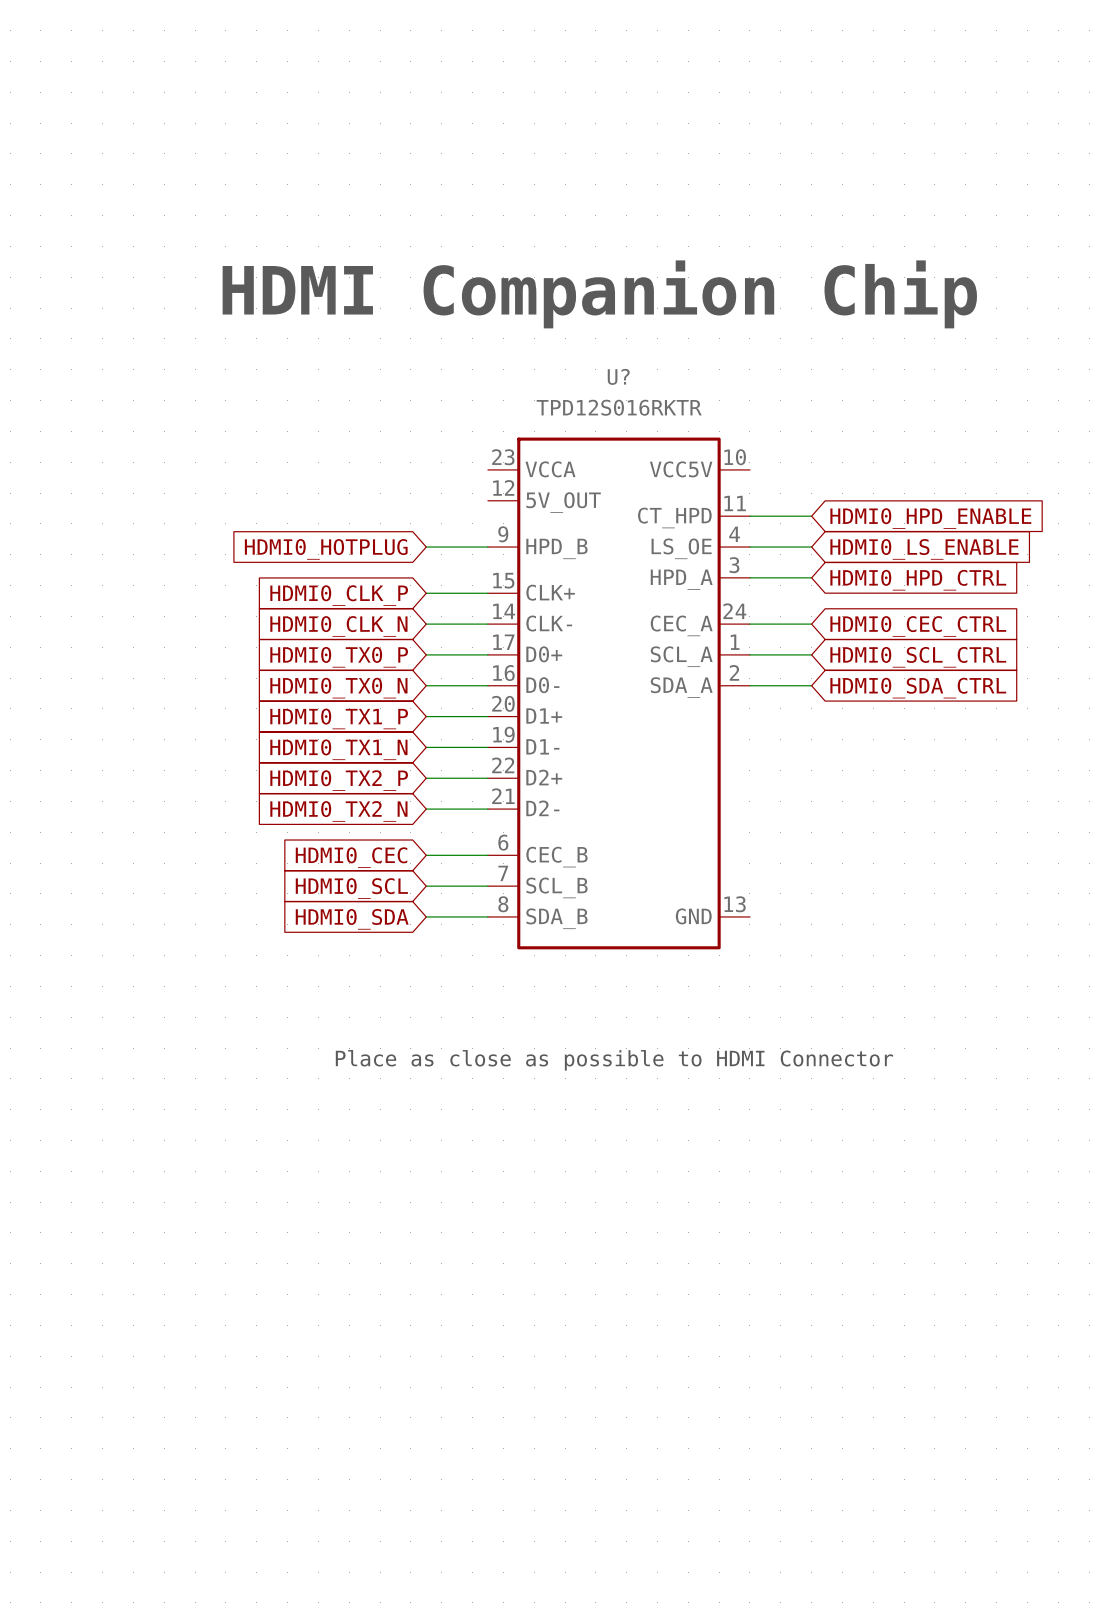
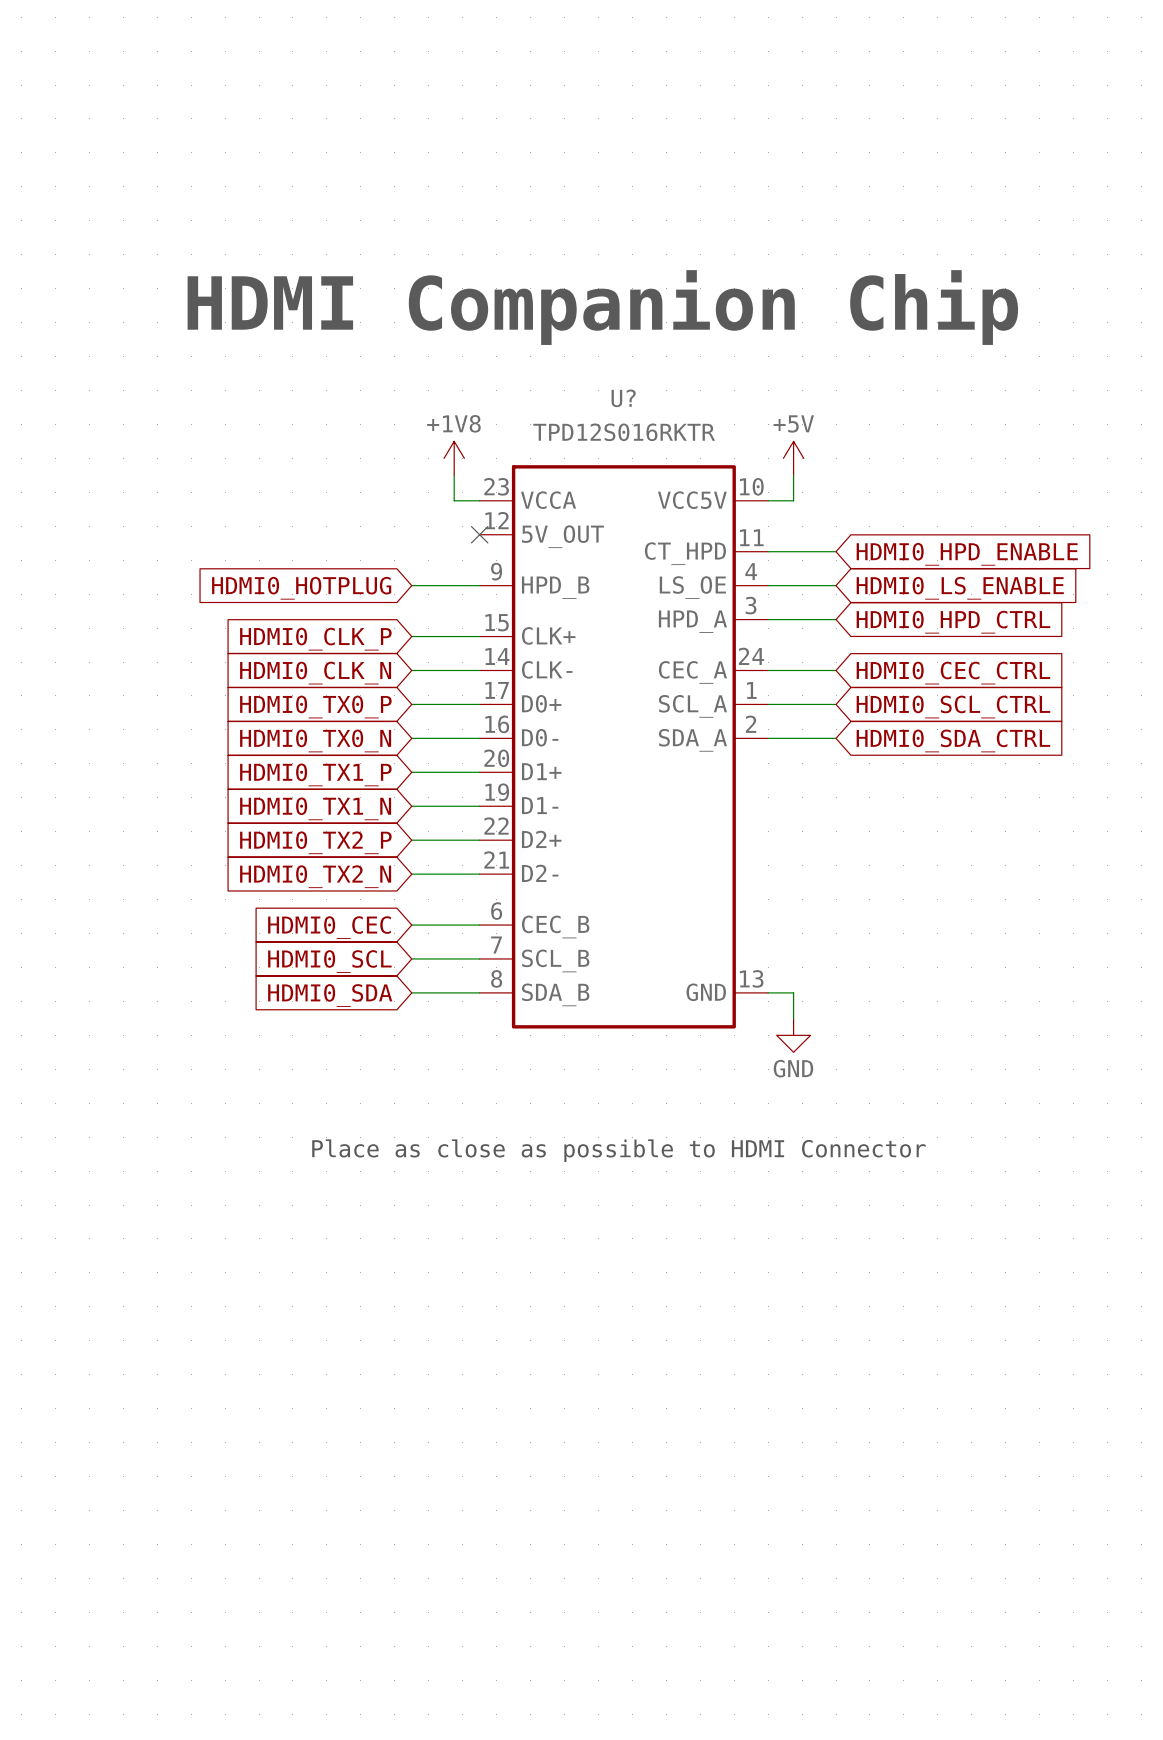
power symbol: none -> +1V8 (454, 458)
power symbol: none -> +5V (793, 458)
wire: none -> (454, 475) (454, 500) (479, 500)
wire: none -> (793, 475) (793, 500) (768, 500)
no-connect mark: none -> (479, 534)
wire: none -> (768, 992) (793, 992) (793, 1018)
power symbol: none -> GND (793, 1035)

